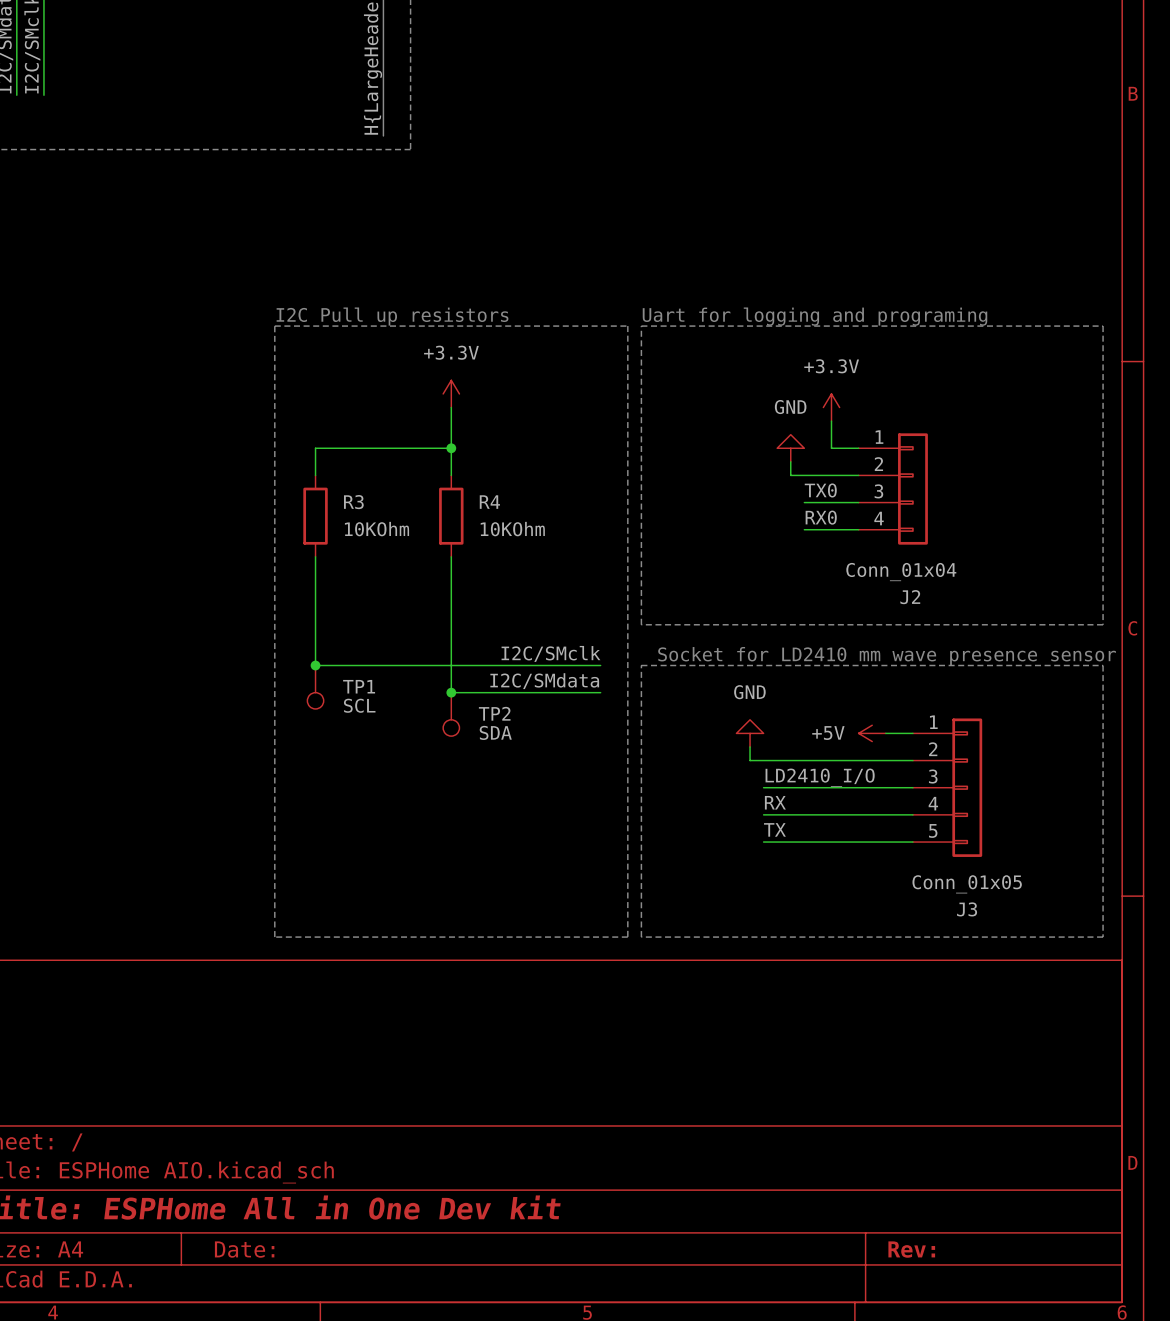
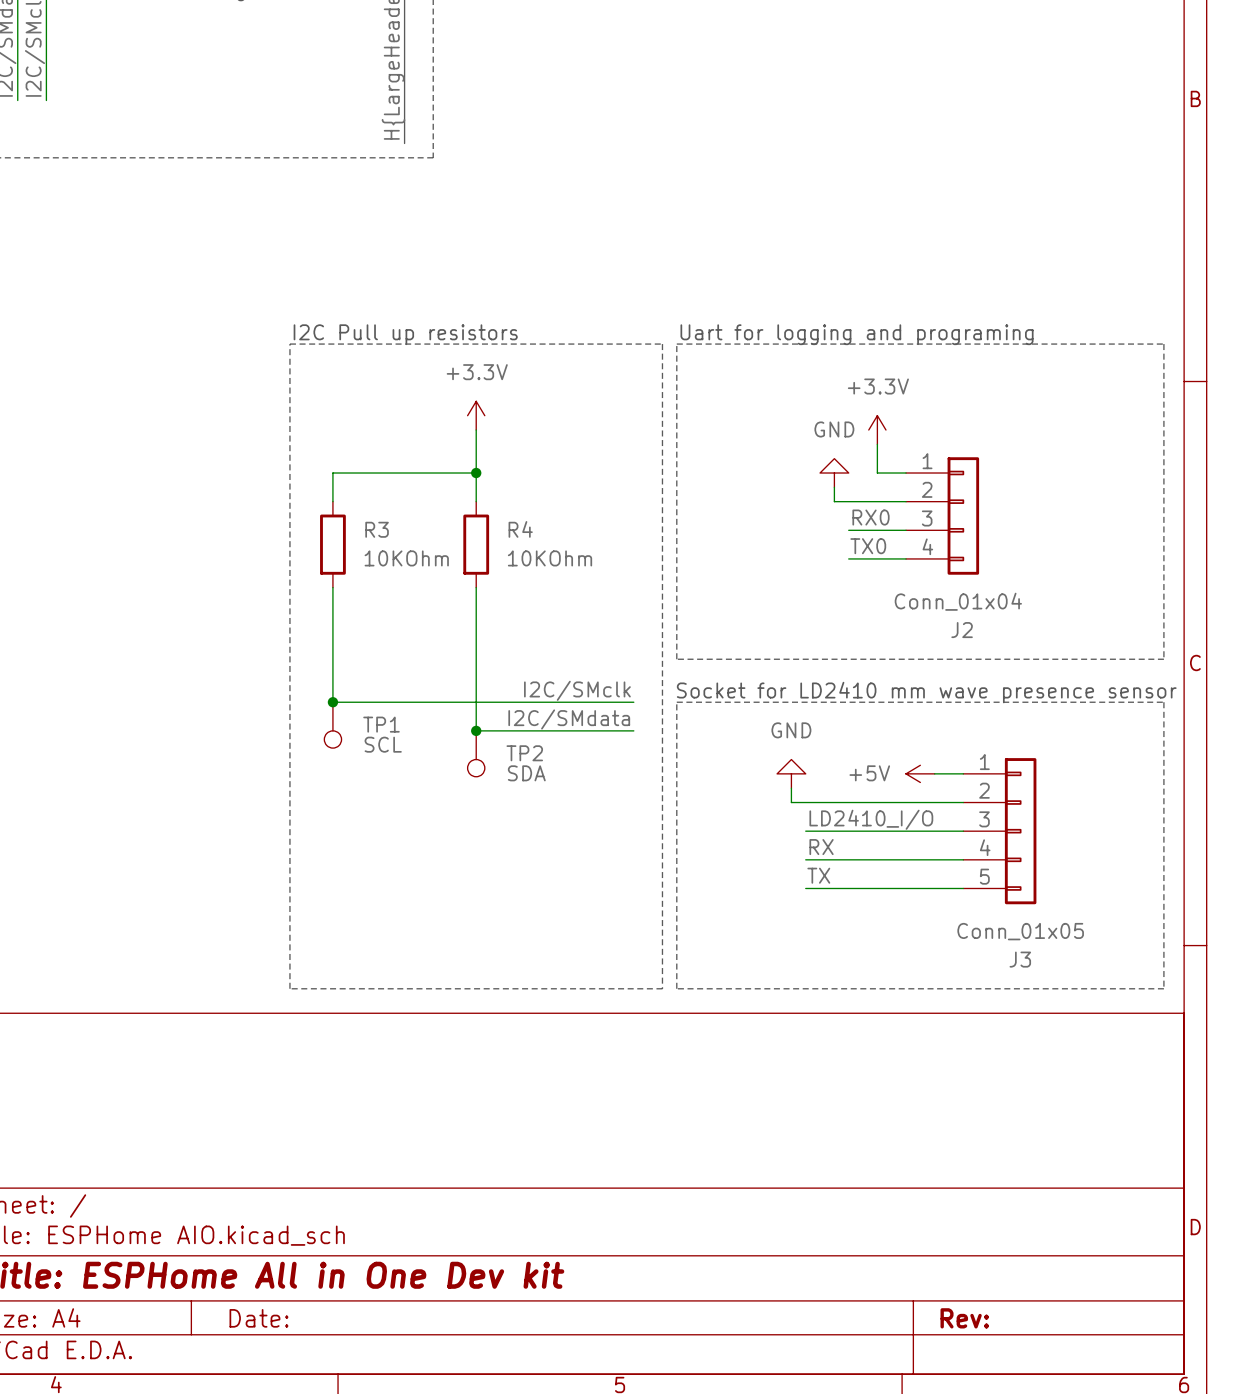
label: TX0 (820, 490) -> RX0 (871, 517)
label: RX0 (821, 517) -> TX0 (868, 546)

